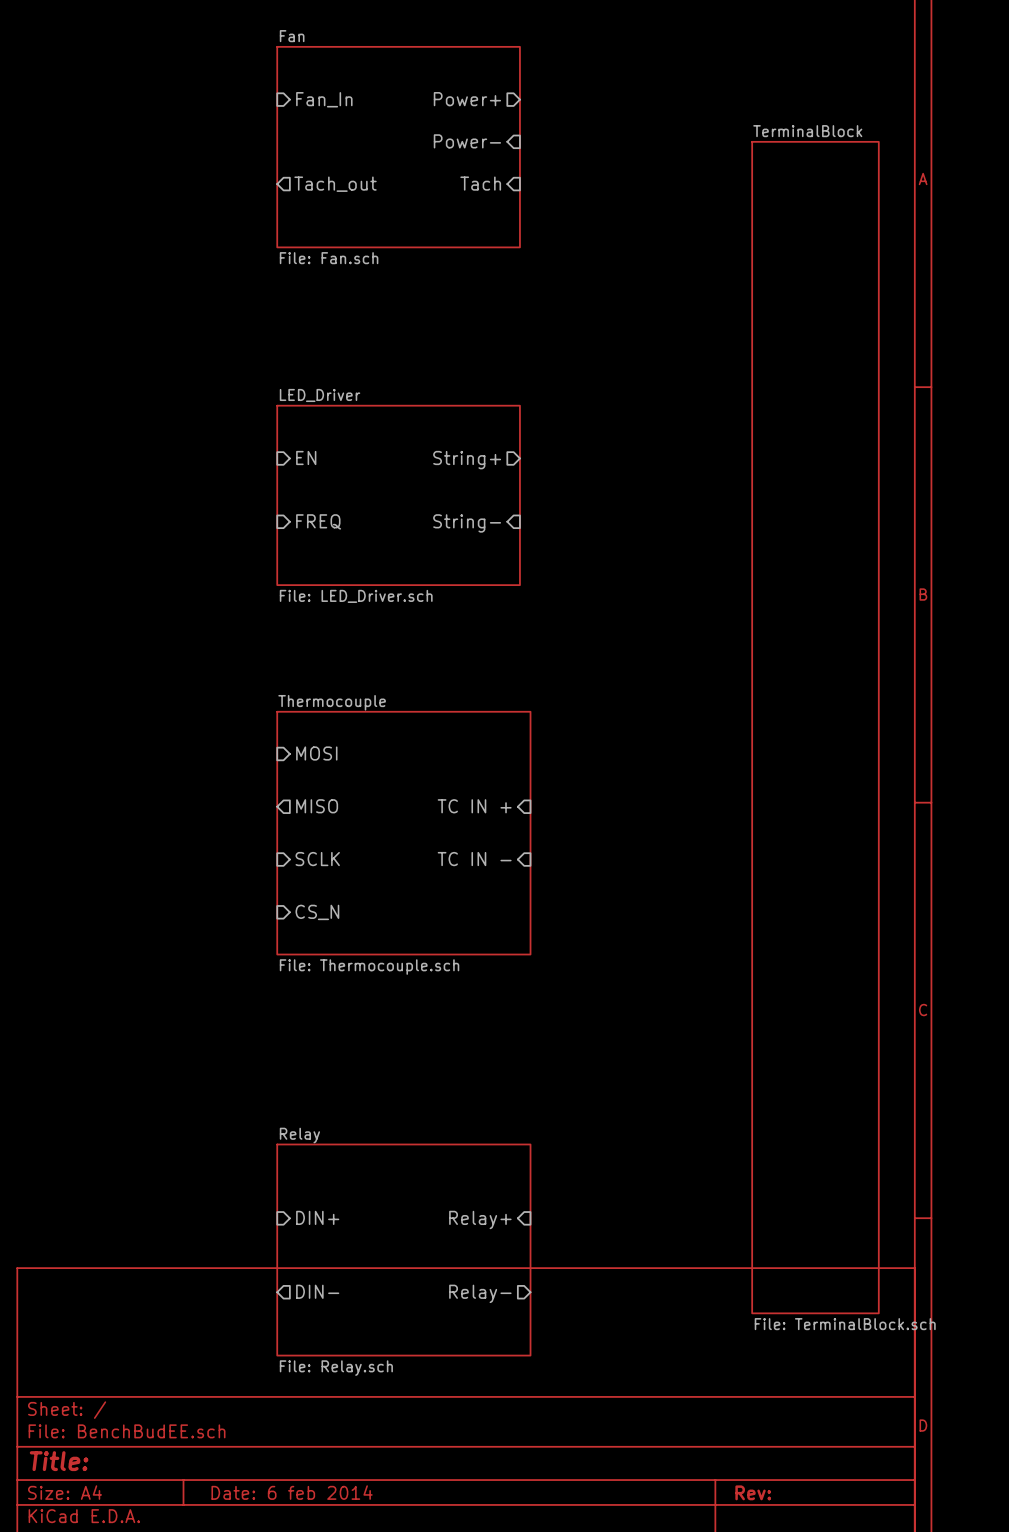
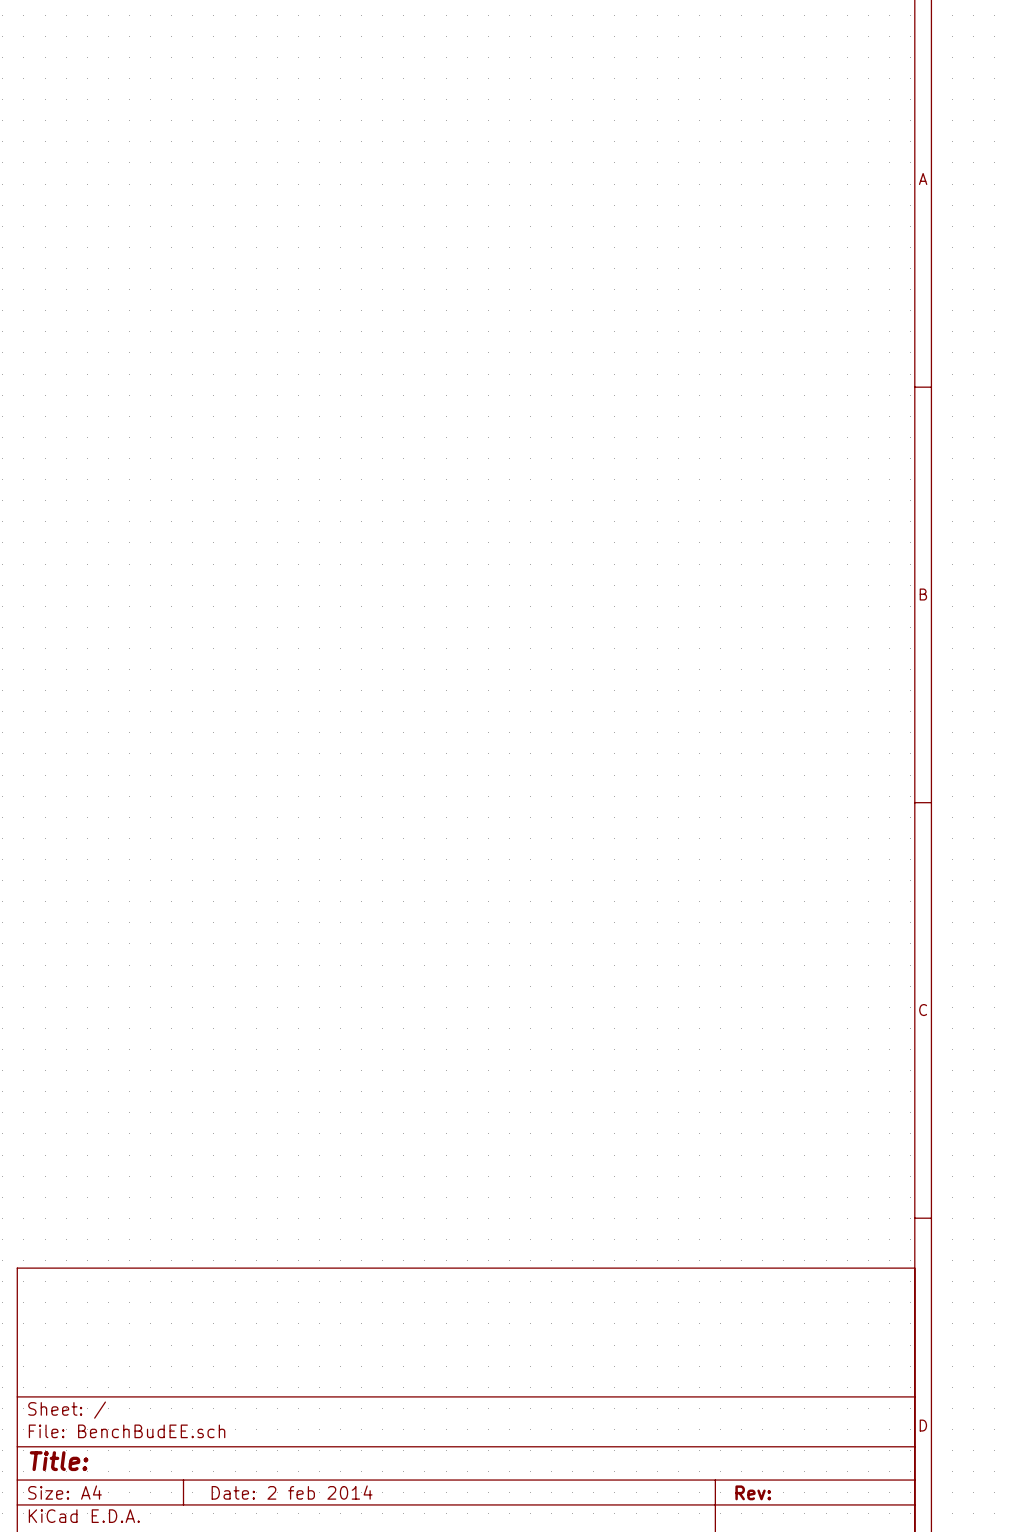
sheet pin: Fan_In (324, 99) -> none
sheet pin: Power+ (467, 99) -> none
sheet pin: Power- (467, 141) -> none
sheet Fan: File: Fan.sch (398, 147) -> none
sheet pin: Tach (480, 183) -> none
sheet pin: Tach_out (335, 184) -> none
sheet pin: EN (306, 457) -> none
sheet pin: String+ (467, 460) -> none
sheet LED_Driver: File: LED_Driver.sch (398, 495) -> none
sheet pin: FREQ (318, 521) -> none
sheet pin: String- (467, 523) -> none
sheet TerminalBlock: File: TerminalBlock.sch (815, 727) -> none
sheet pin: MOSI (316, 753) -> none
sheet pin: MISO (317, 806) -> none
sheet pin: TC IN + (474, 806) -> none
sheet Thermocouple: File: Thermocouple.sch (403, 833) -> none
sheet pin: SCLK (317, 859) -> none
sheet pin: TC IN - (474, 859) -> none
sheet pin: CS_N (317, 912) -> none
sheet pin: DIN+ (317, 1217) -> none
sheet pin: Relay+ (480, 1220) -> none
sheet Relay: File: Relay.sch (403, 1250) -> none
sheet pin: DIN- (317, 1291) -> none
sheet pin: Relay- (480, 1293) -> none
title block: Date: 6 feb 2014 (292, 1492) -> Date: 2 feb 2014 (292, 1492)

